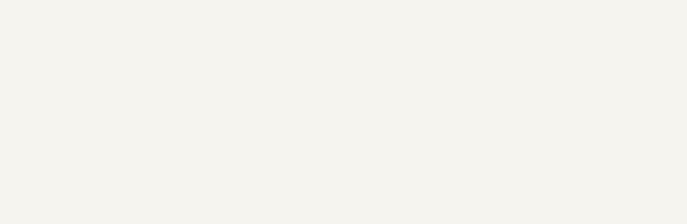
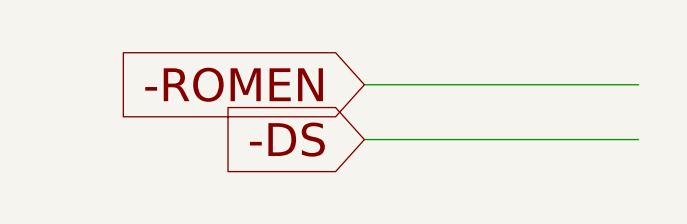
global label: none -> -ROMEN (234, 84)
wire: none -> (364, 84) (638, 84)
global label: none -> -DS (287, 139)
wire: none -> (364, 139) (638, 139)

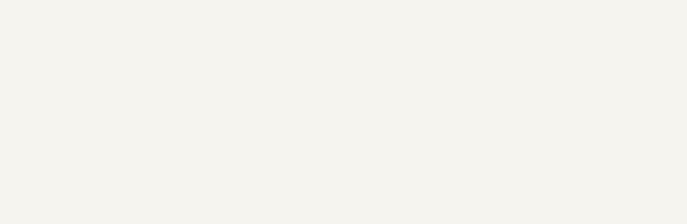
global label: -ROMEN (234, 84) -> none
wire: (364, 84) (638, 84) -> none
global label: -DS (287, 139) -> none
wire: (364, 139) (638, 139) -> none

